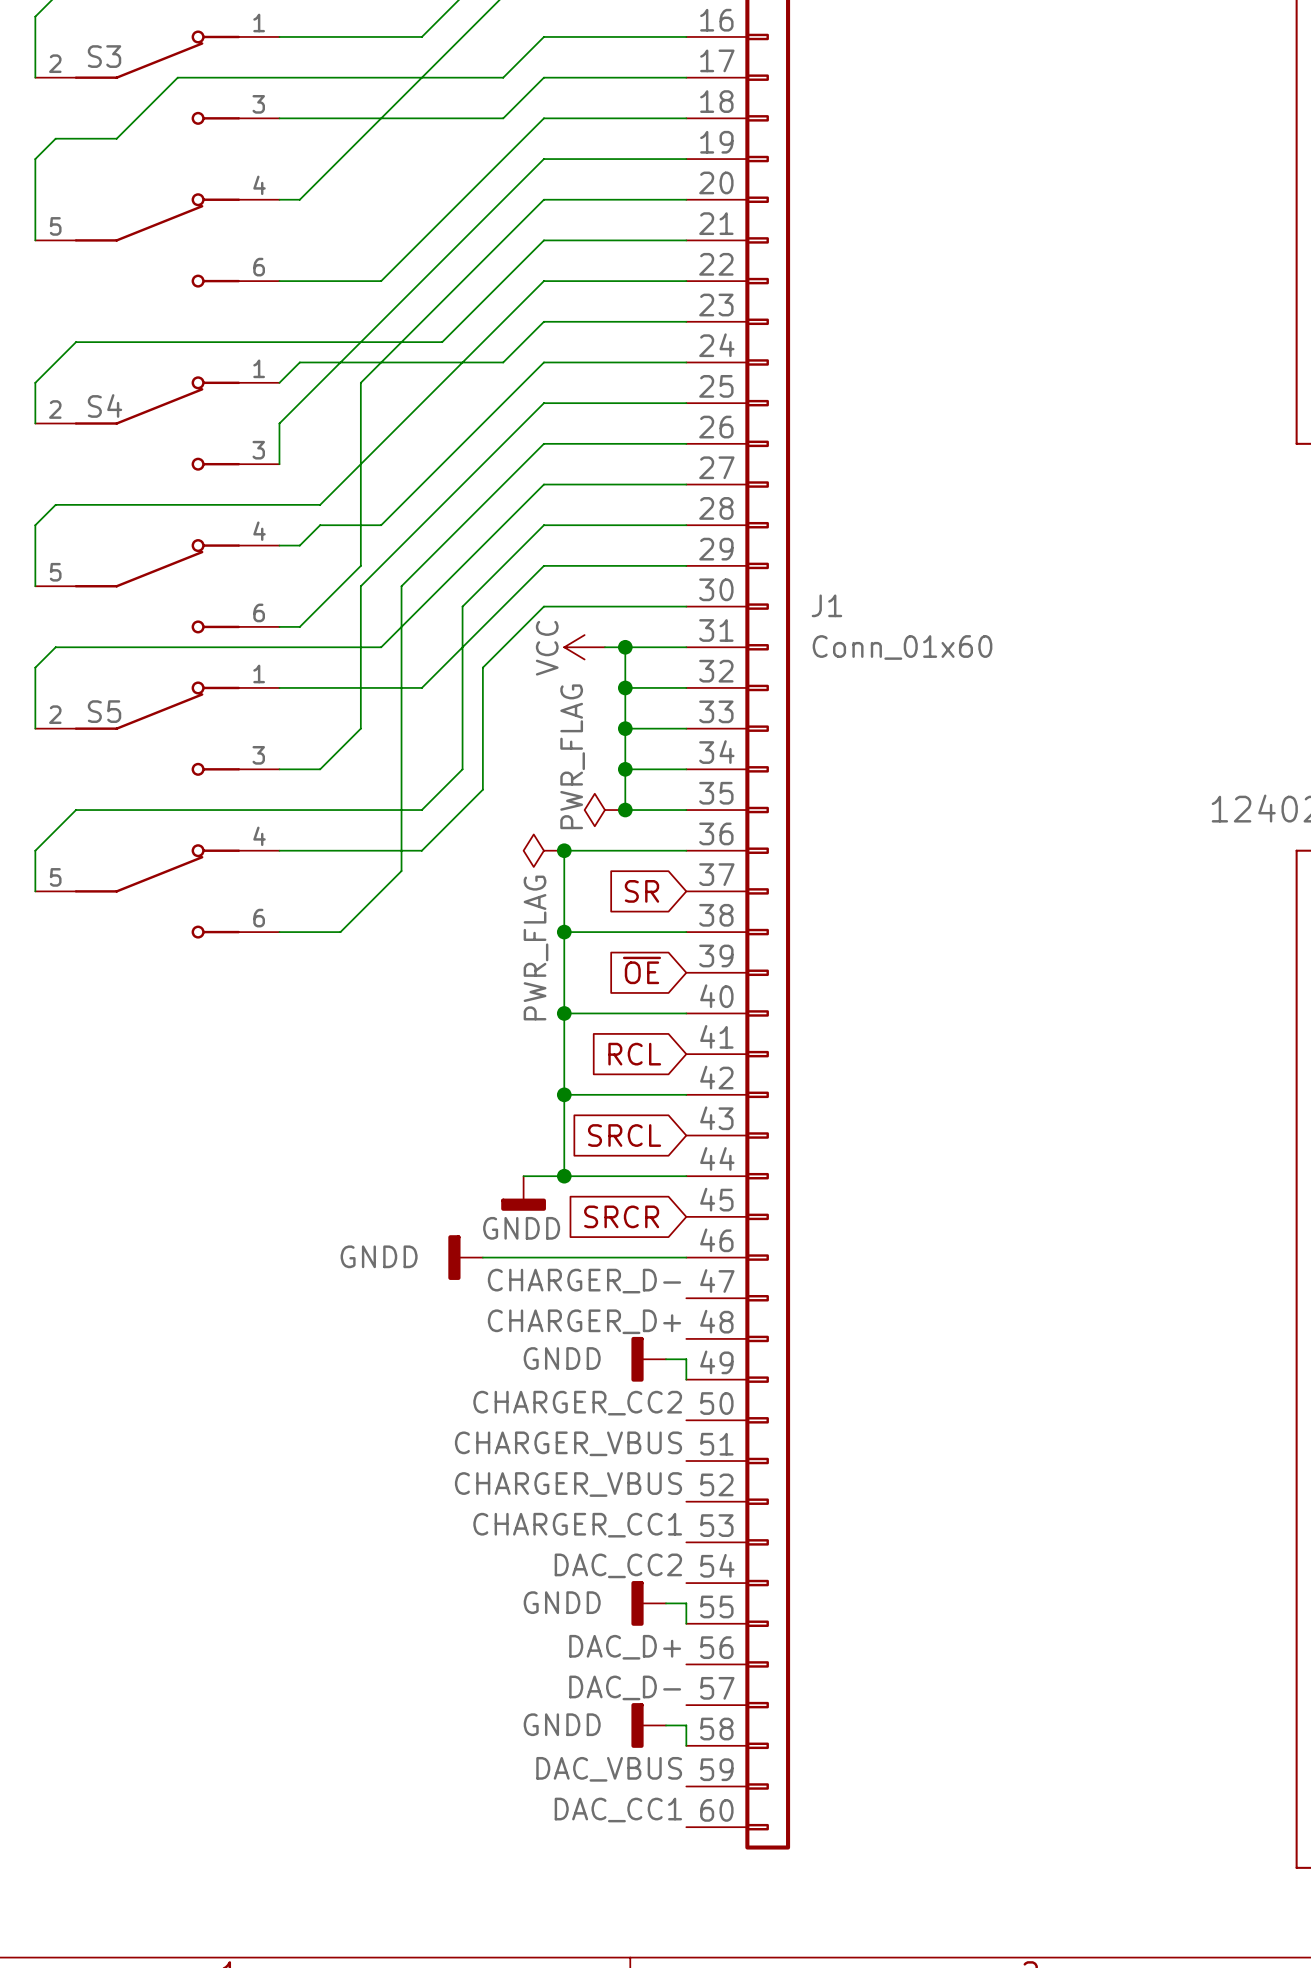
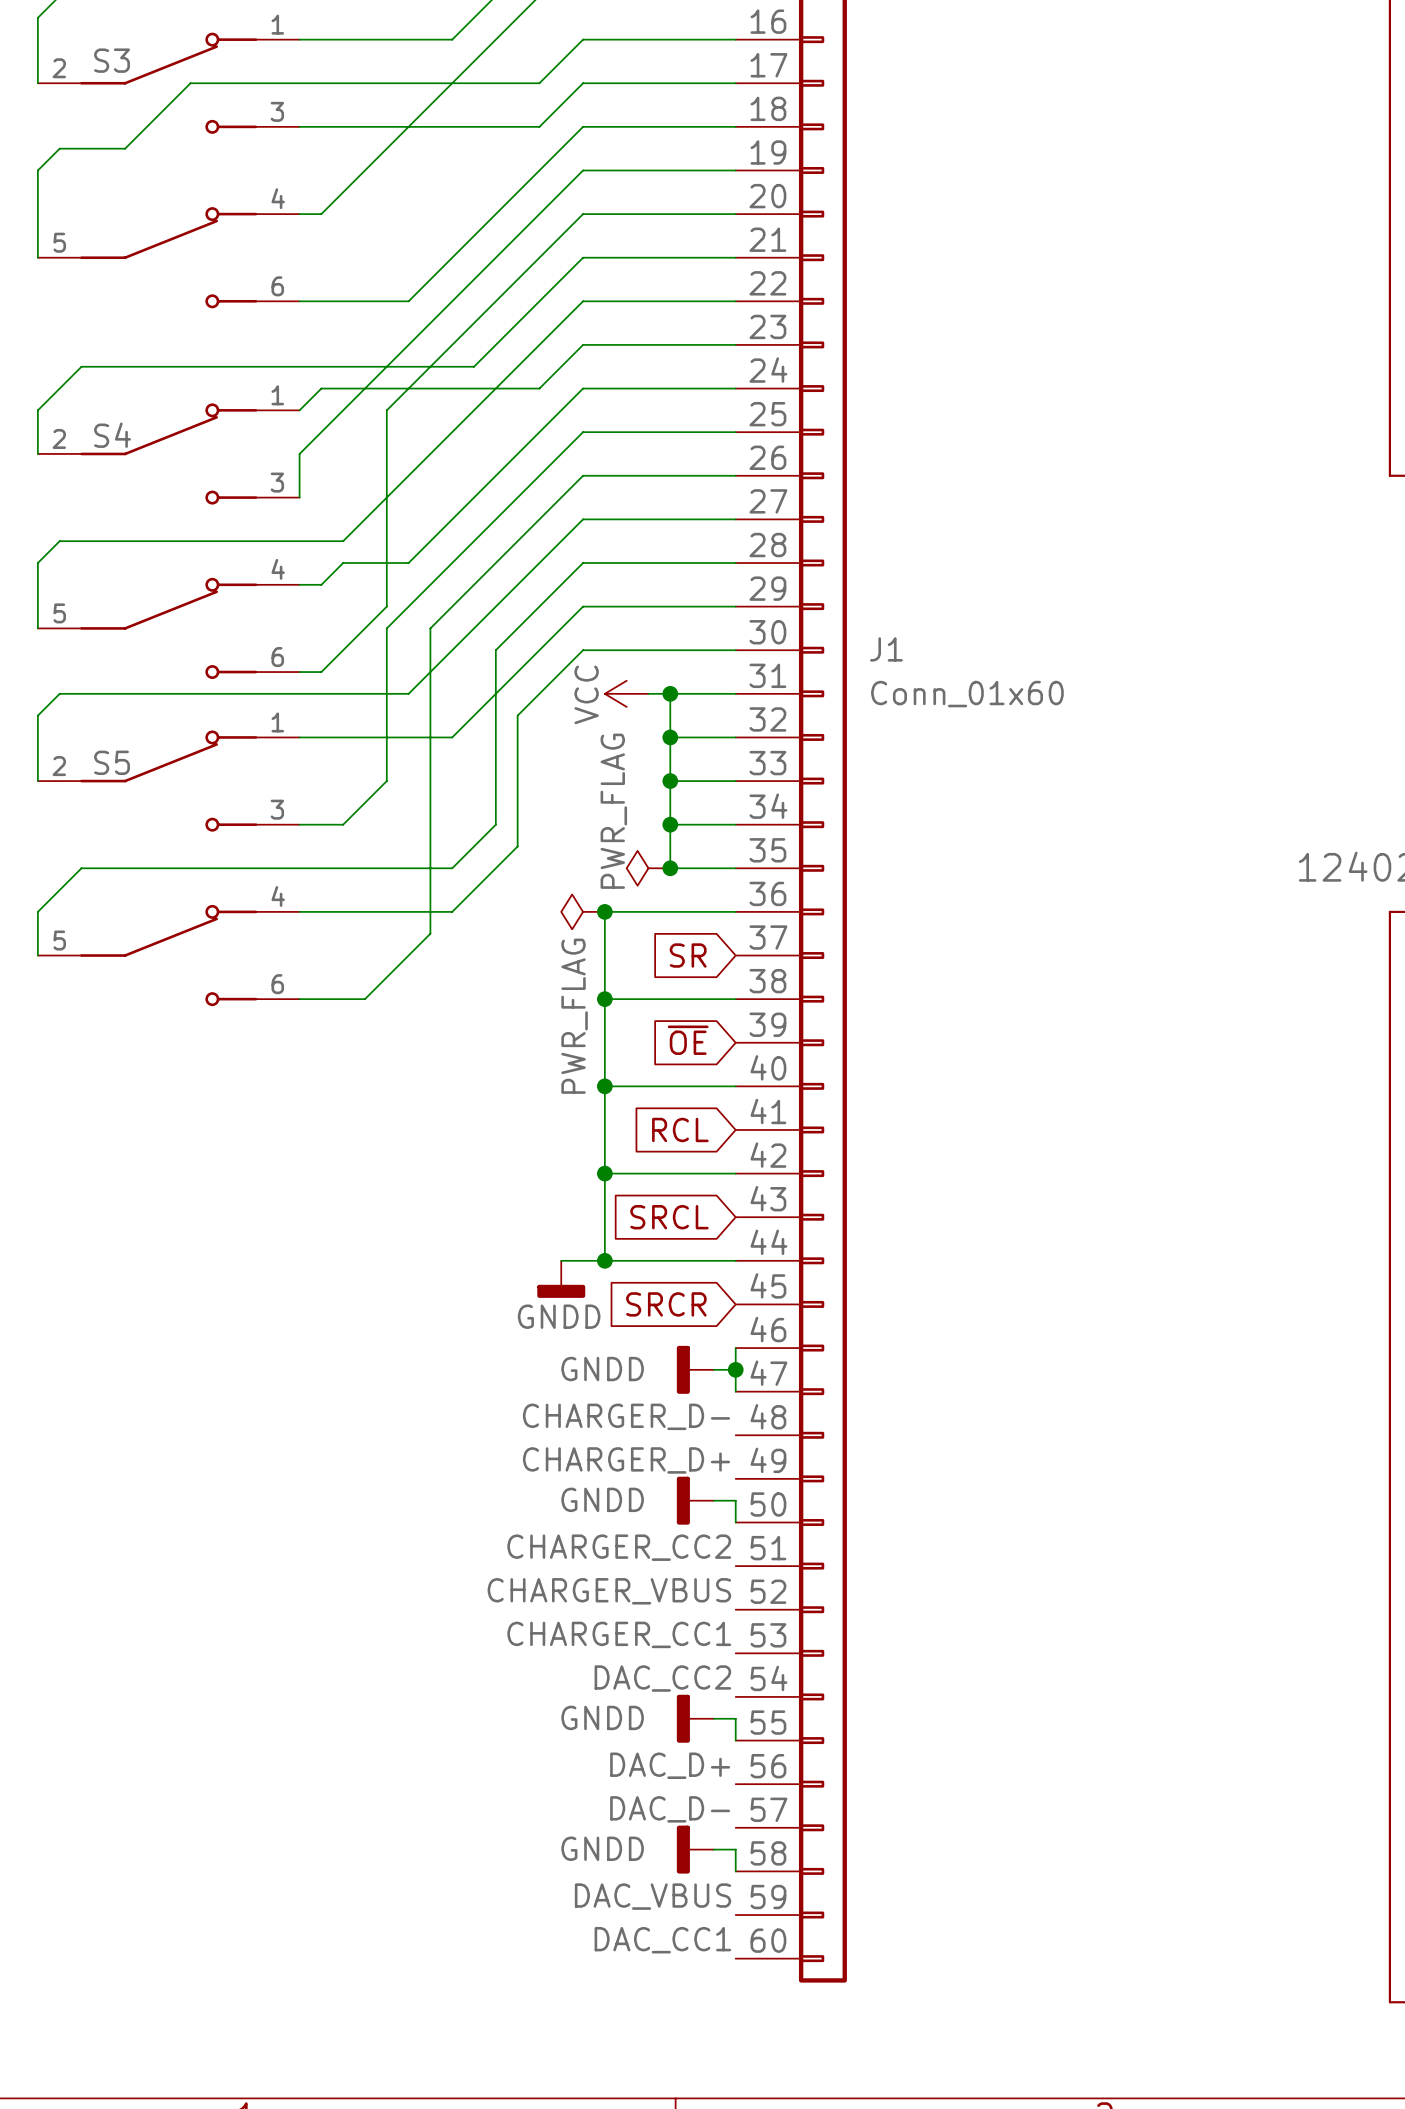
power symbol: GNDD (465, 1257) -> none
wire: (482, 1257) (686, 1257) -> (735, 1391) (735, 1348)
power symbol: none -> GNDD (695, 1369)
wire: none -> (713, 1369) (735, 1369)
junction: none -> (735, 1369)
label: CHARGER_D- (584, 1281) -> none
label: CHARGER_D+ (584, 1321) -> CHARGER_D- (626, 1416)
power symbol: GNDD (648, 1359) -> none
wire: (665, 1359) (686, 1359) (686, 1379) -> (713, 1500) (735, 1500) (735, 1522)
power symbol: none -> GNDD (695, 1500)
label: CHARGER_CC2 (577, 1403) -> CHARGER_D+ (626, 1460)
label: CHARGER_VBUS (568, 1443) -> CHARGER_CC2 (619, 1547)

